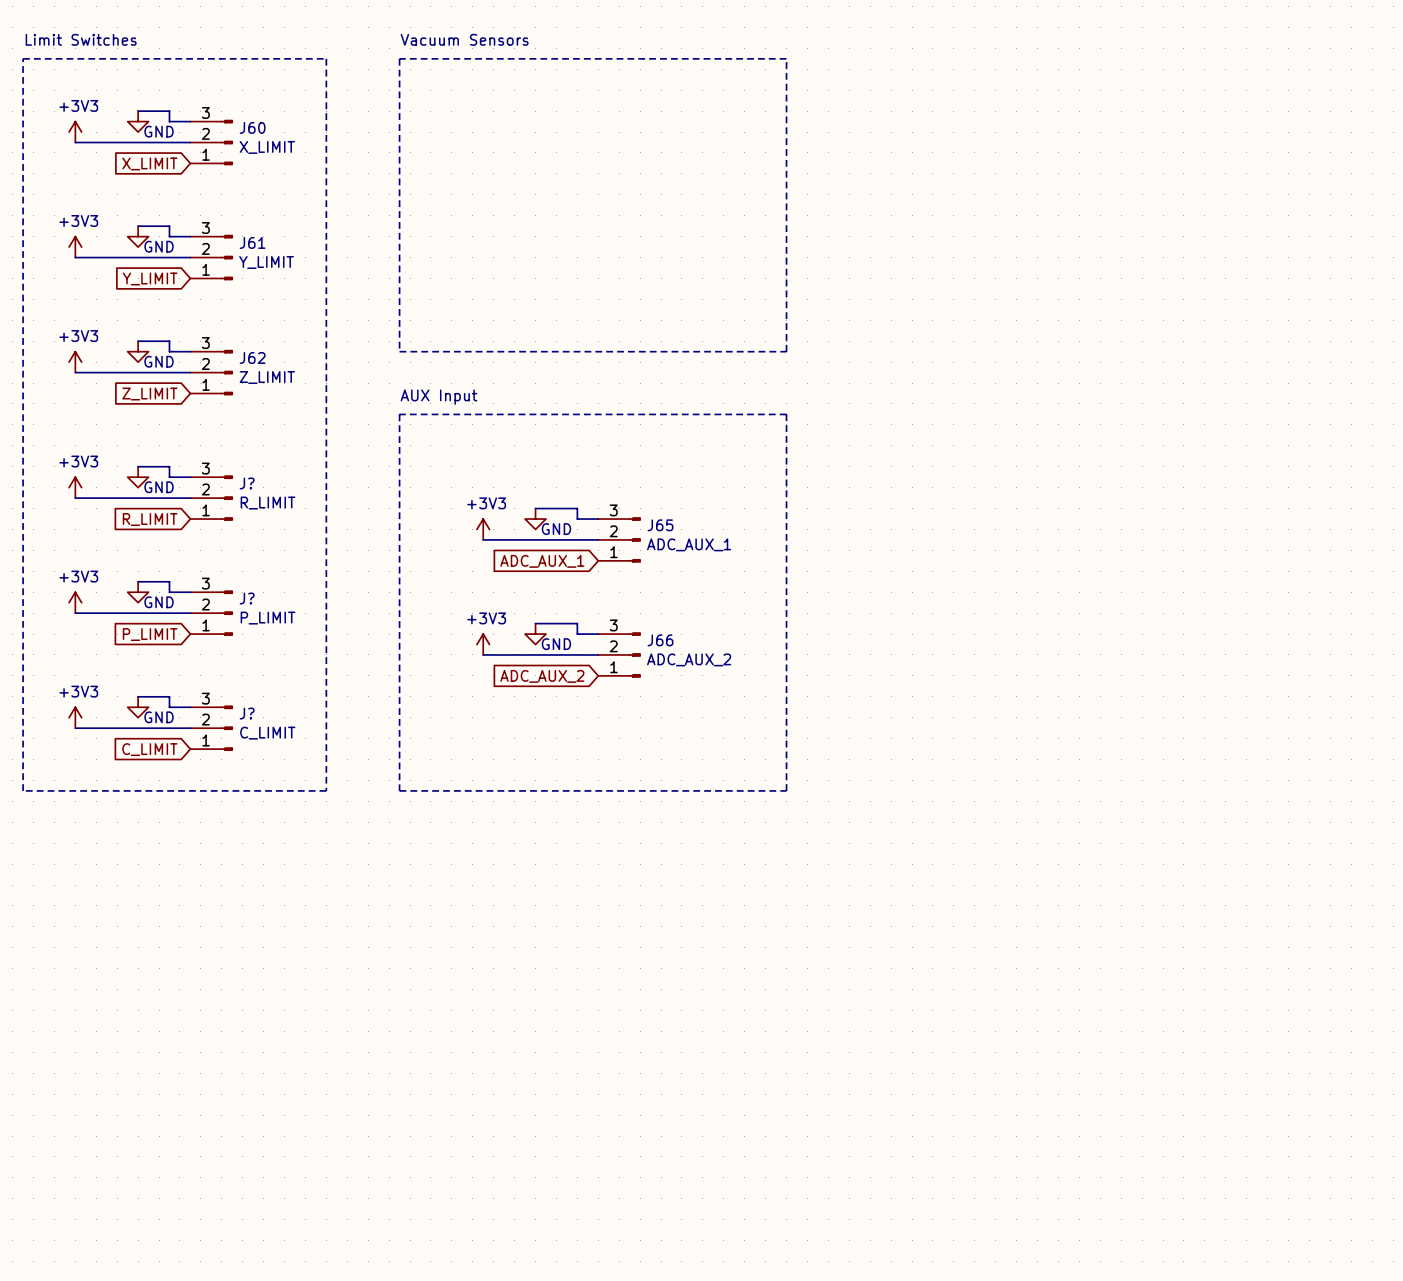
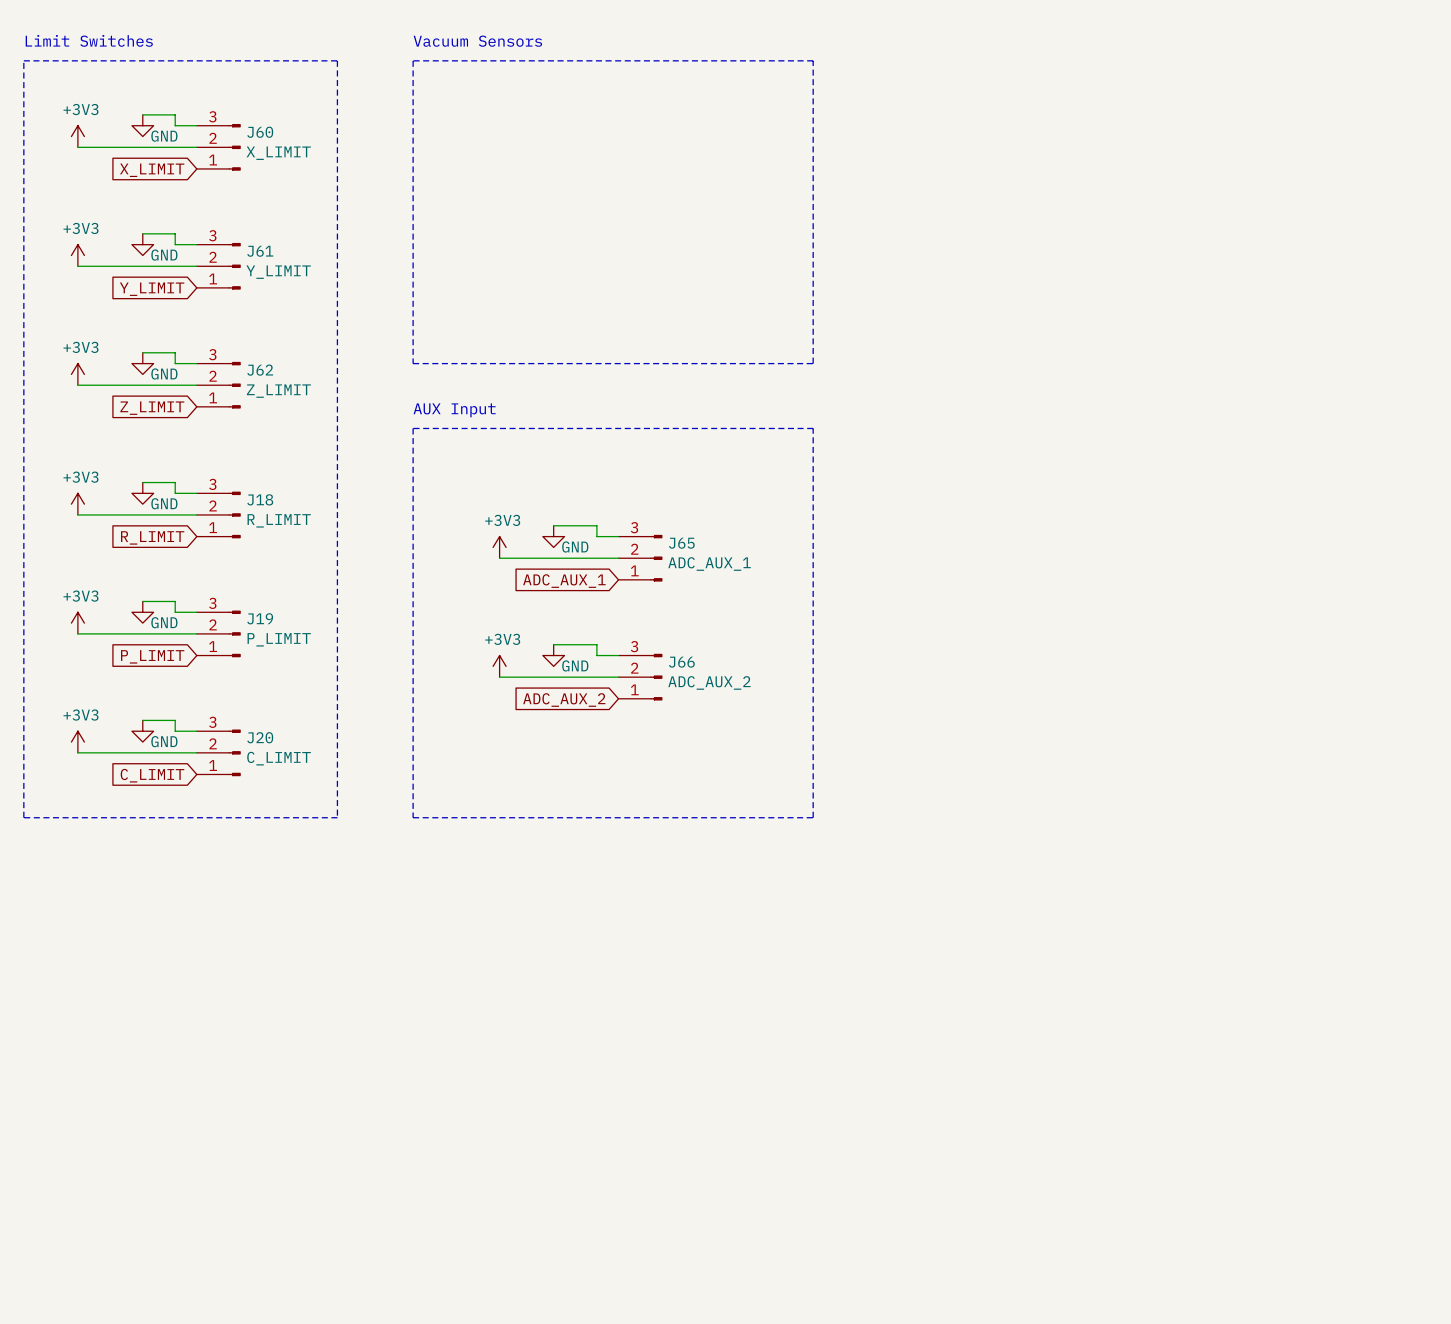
J? name: J? (247, 483) -> J18 (260, 499)
J? name: J? (247, 598) -> J19 (260, 618)
J? name: J? (247, 713) -> J20 (260, 737)

